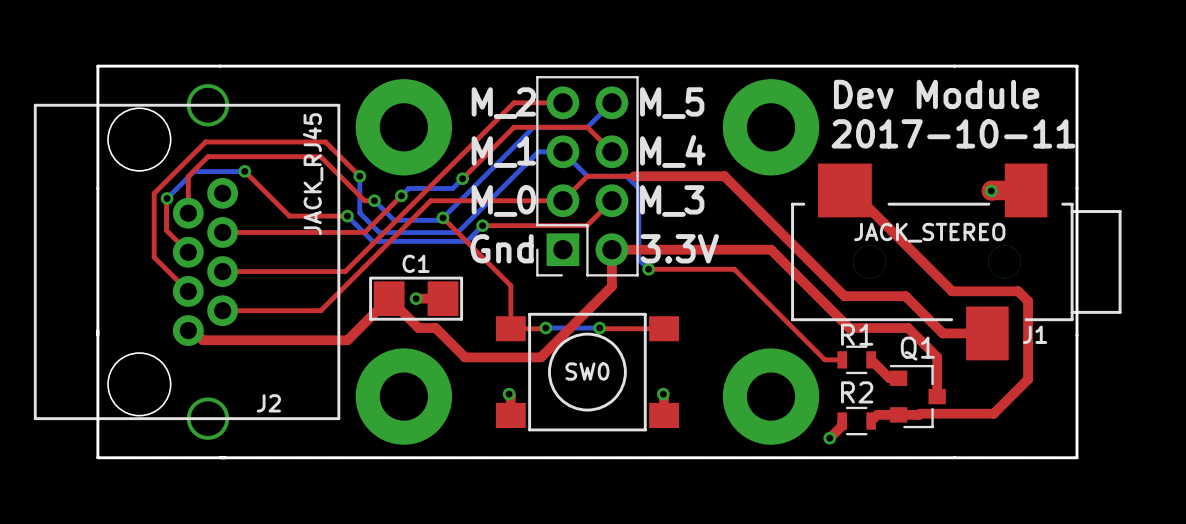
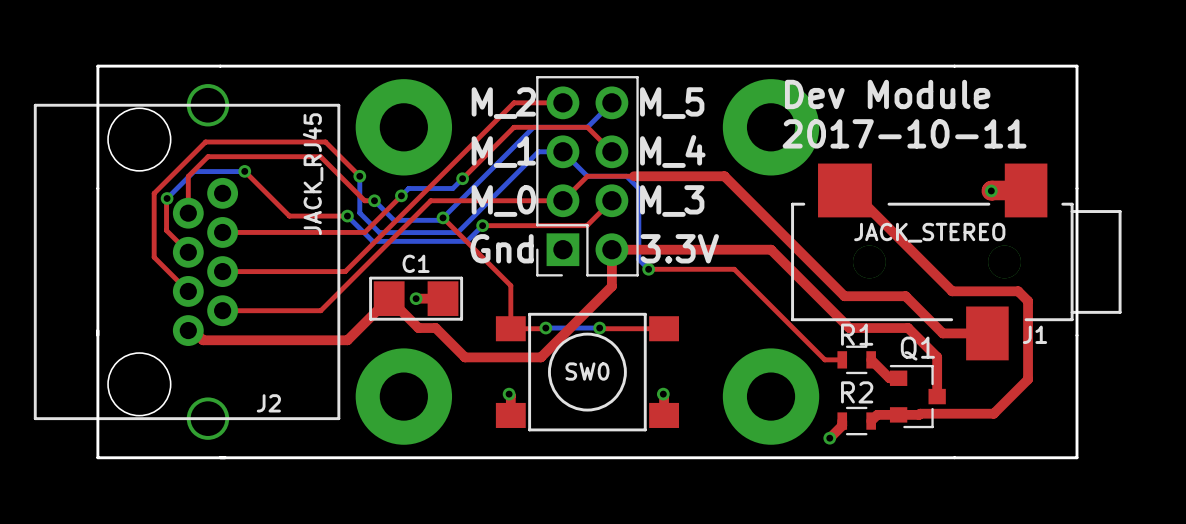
text position: Dev Module (936, 94) -> Dev Module (887, 94)
text position: 2017-10-11 (953, 133) -> 2017-10-11 (904, 133)

